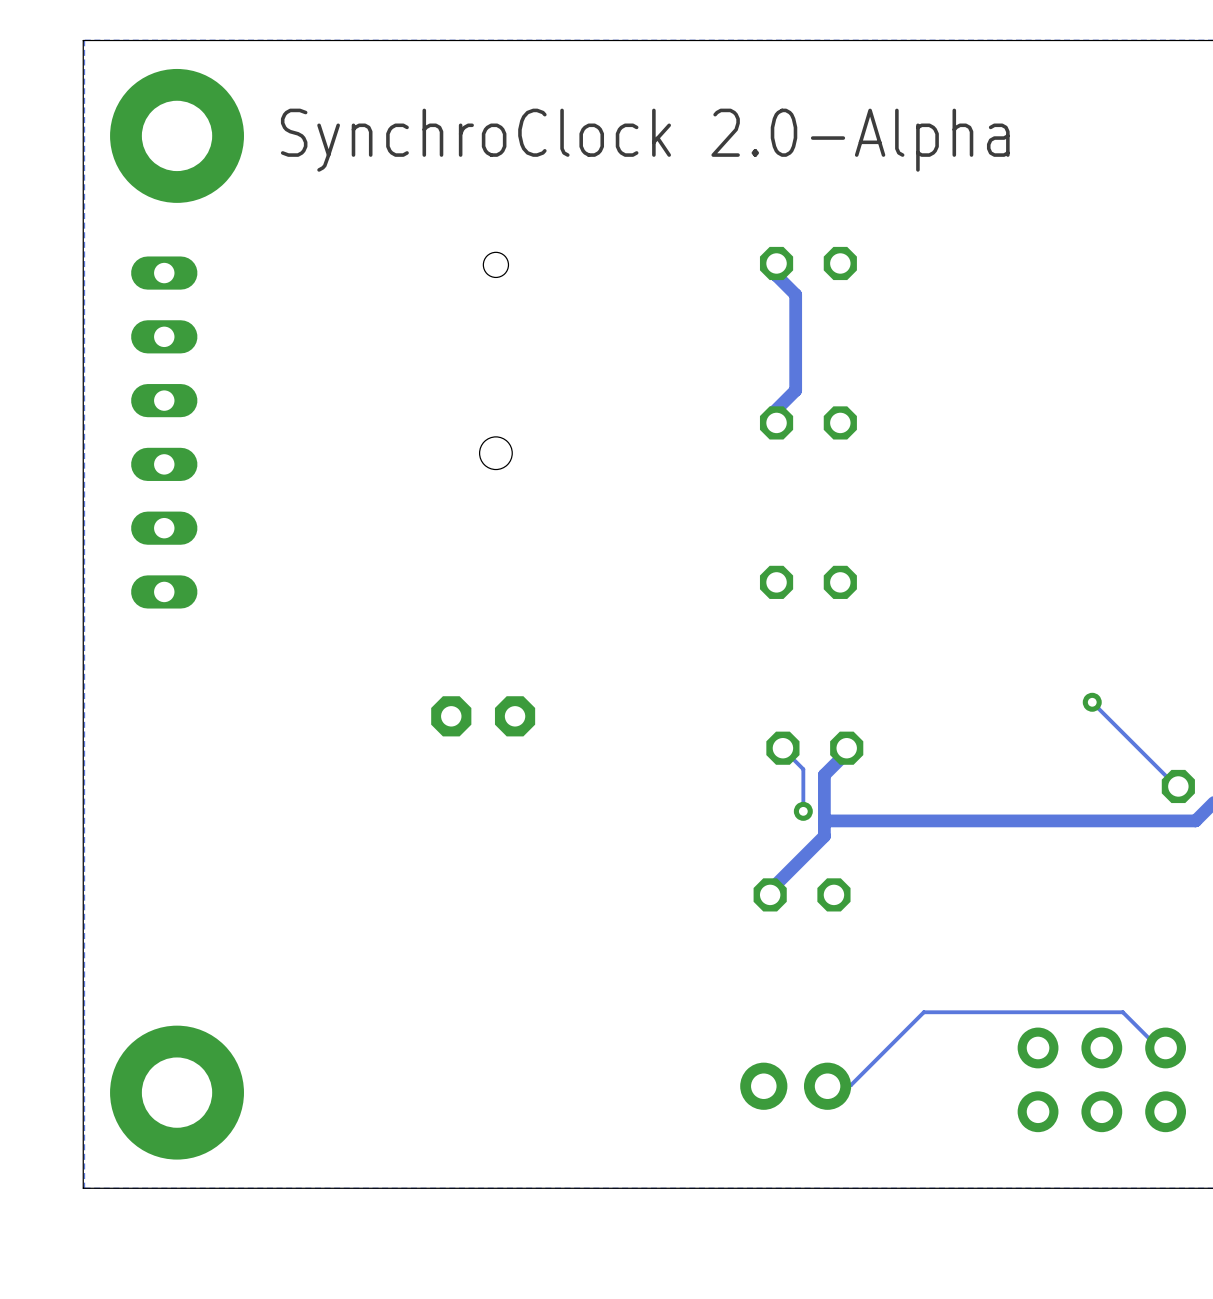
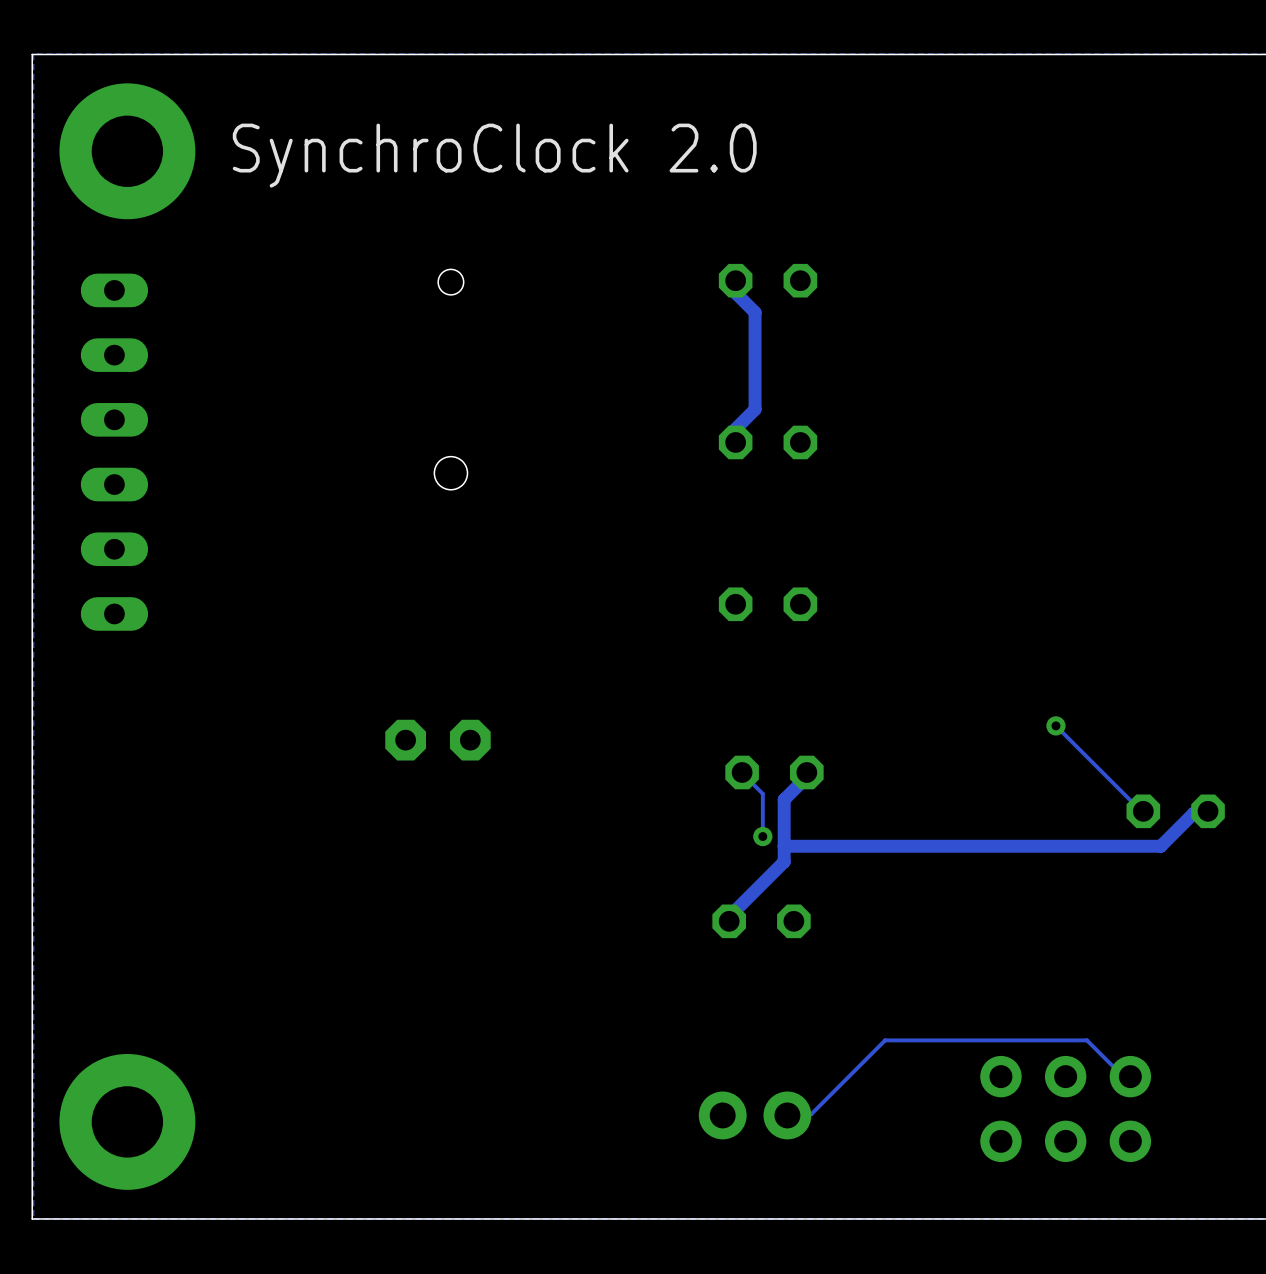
text: SynchroClock 2.0-Alpha (645, 140) -> SynchroClock 2.0 (494, 155)

